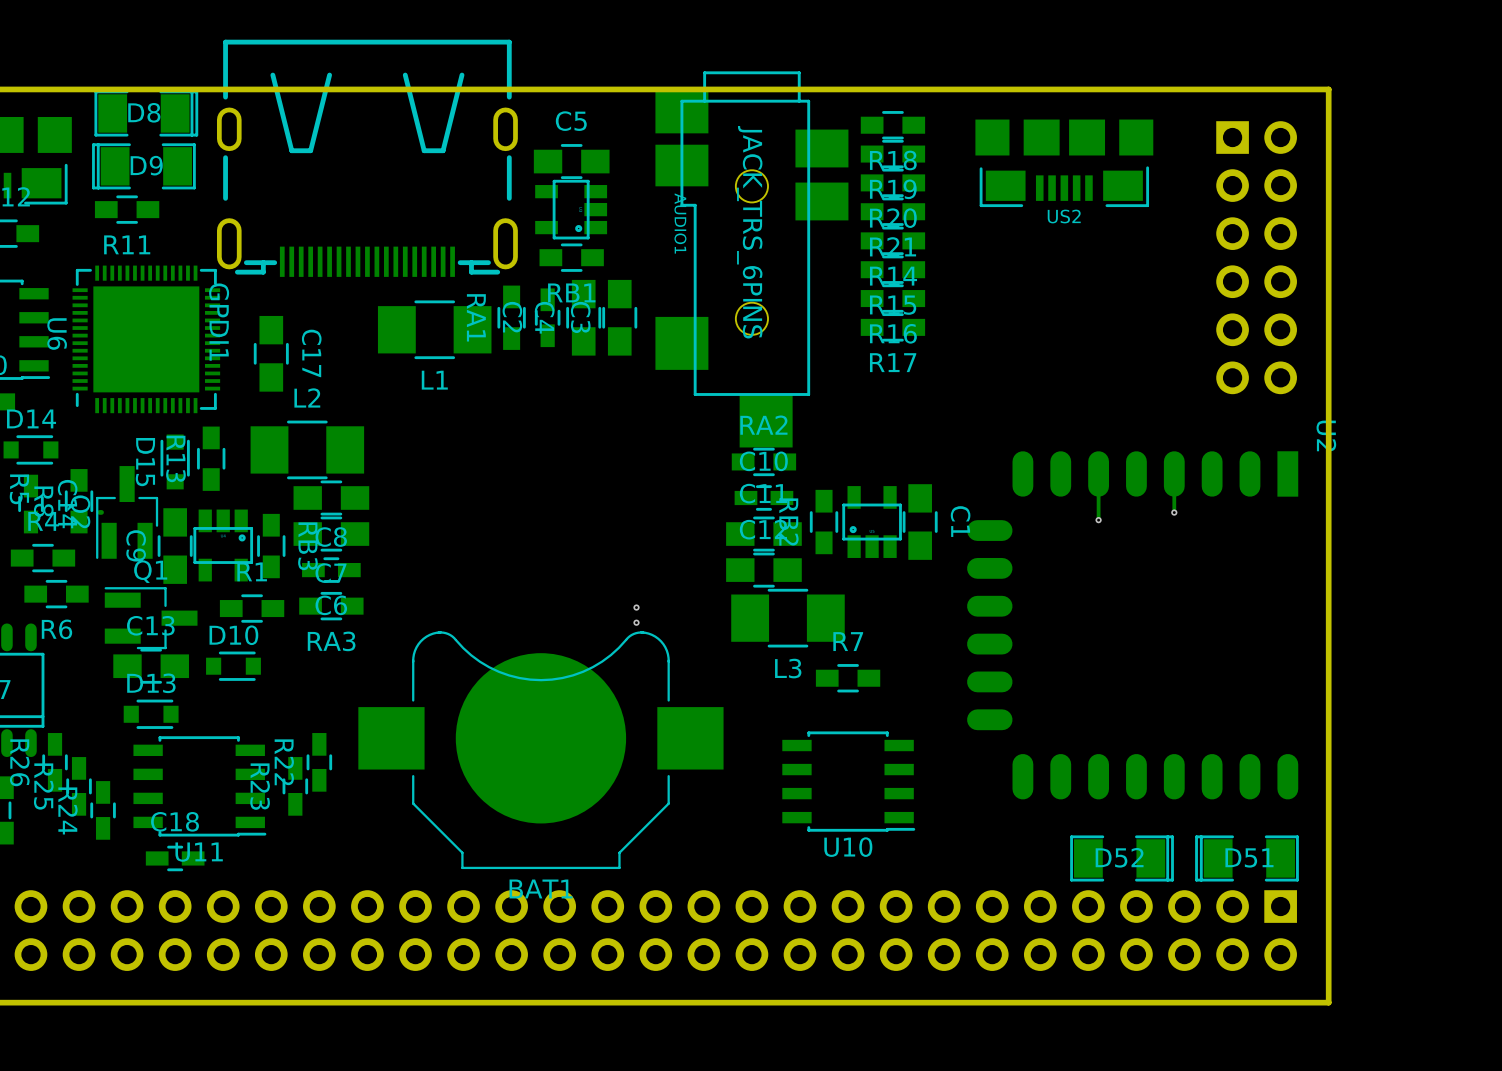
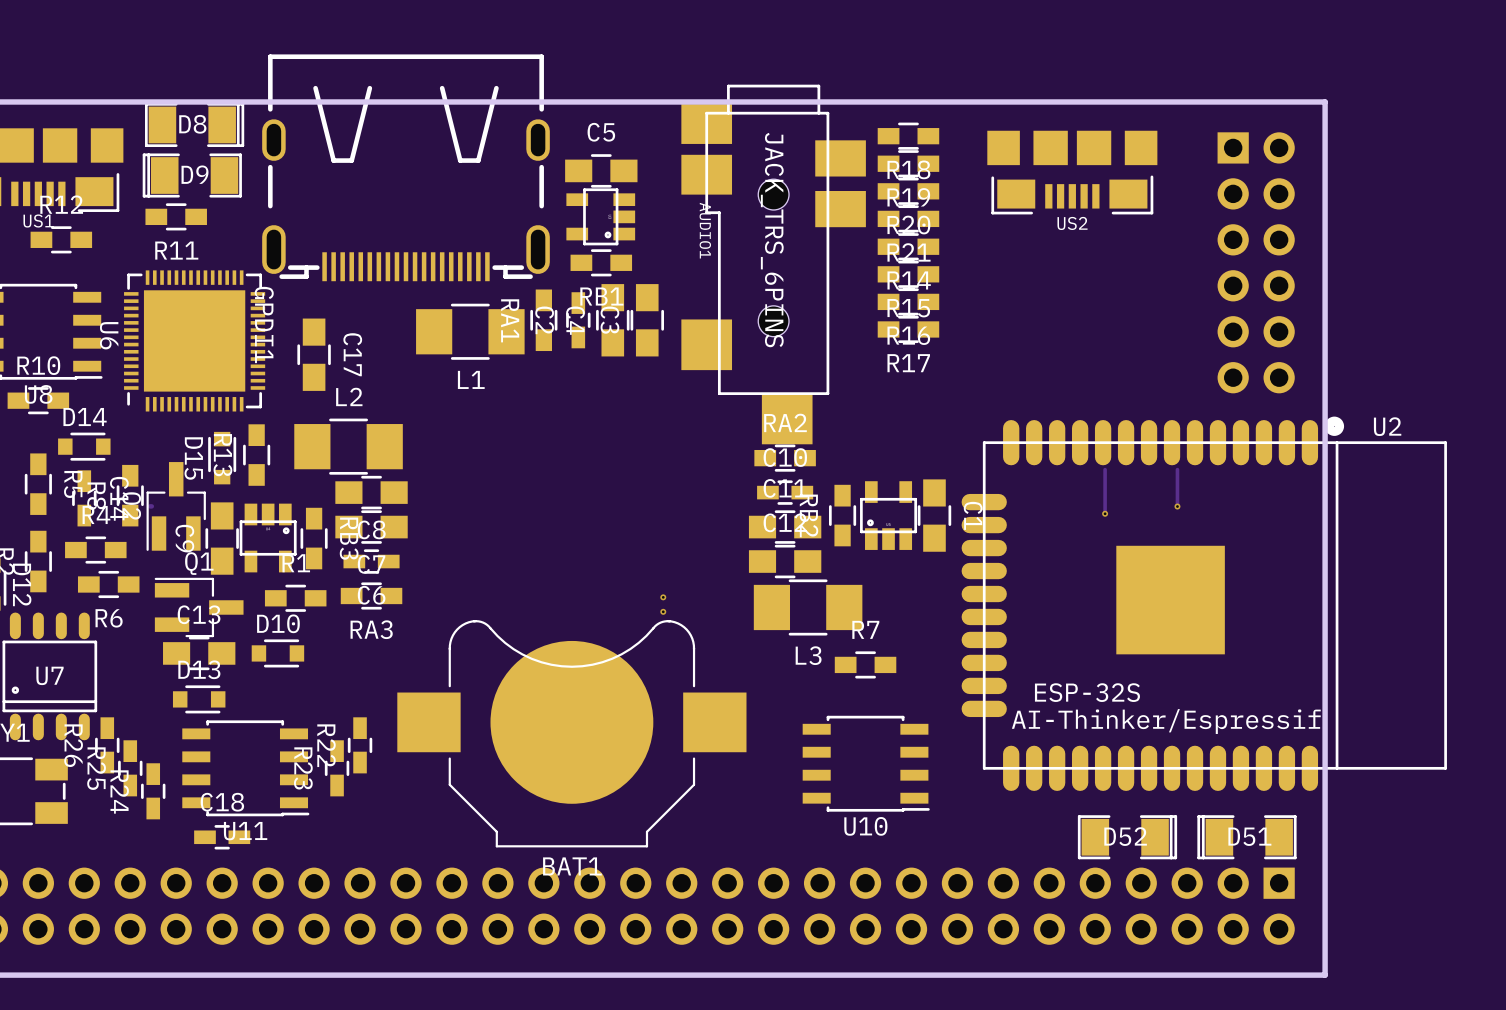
U2 footprint: [967, 451, 1299, 800] -> [961, 416, 1447, 791]

